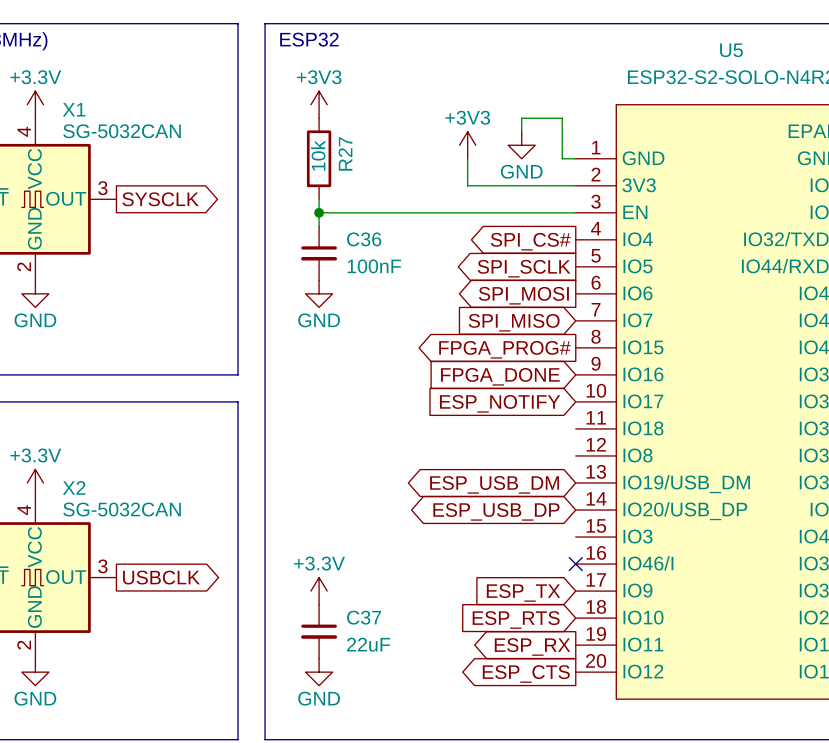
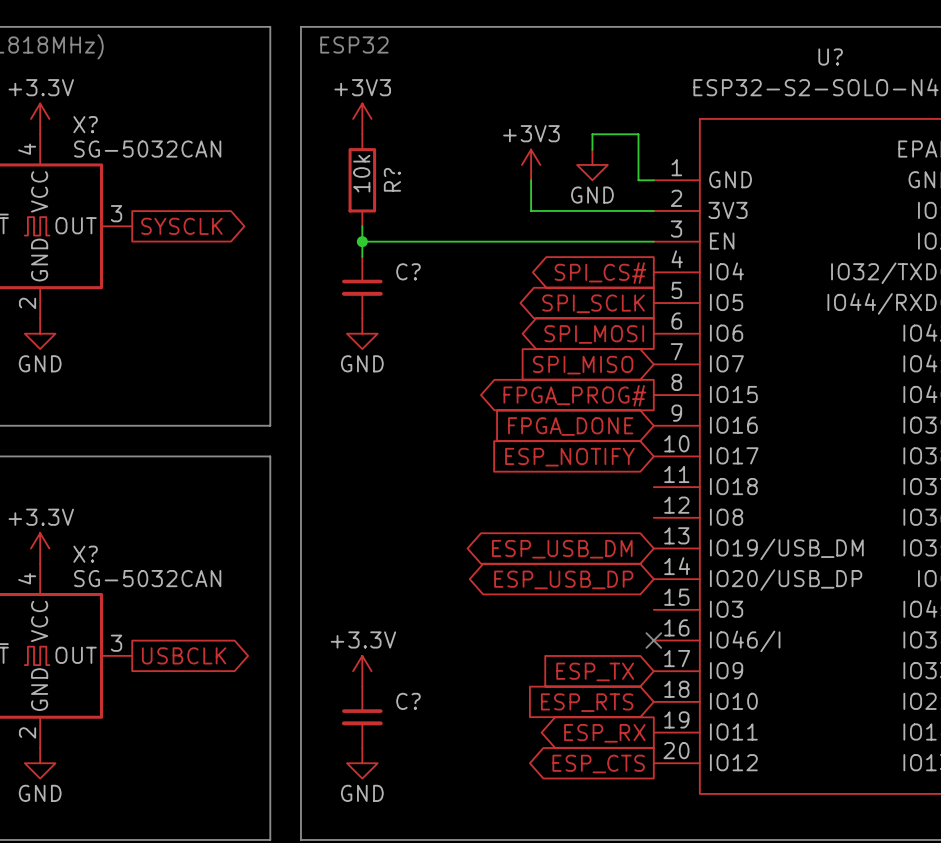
U5 name: U5 (731, 50) -> U? (830, 57)
X1 name: X1 (74, 109) -> X? (85, 124)
R27 name: R27 (345, 153) -> R? (392, 179)
C36 name: C36 (364, 239) -> C? (408, 271)
C36 value: 100nF (374, 266) -> none
X2 name: X2 (74, 487) -> X? (85, 554)
C37 name: C37 (364, 617) -> C? (408, 701)
C37 value: 22uF (368, 644) -> none

